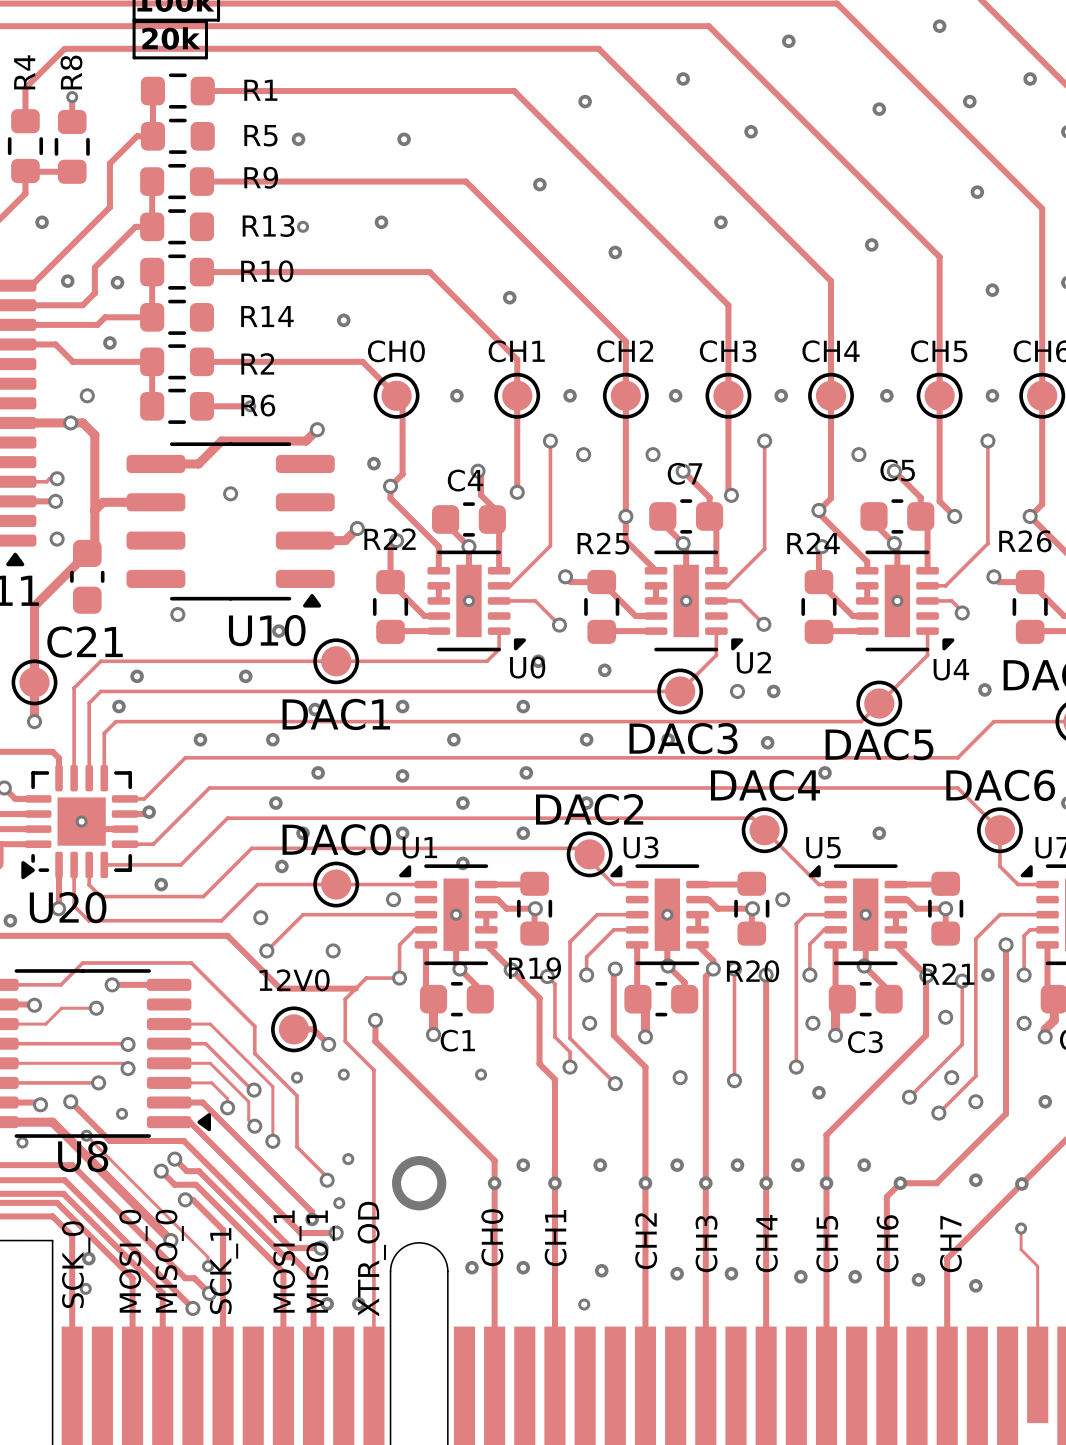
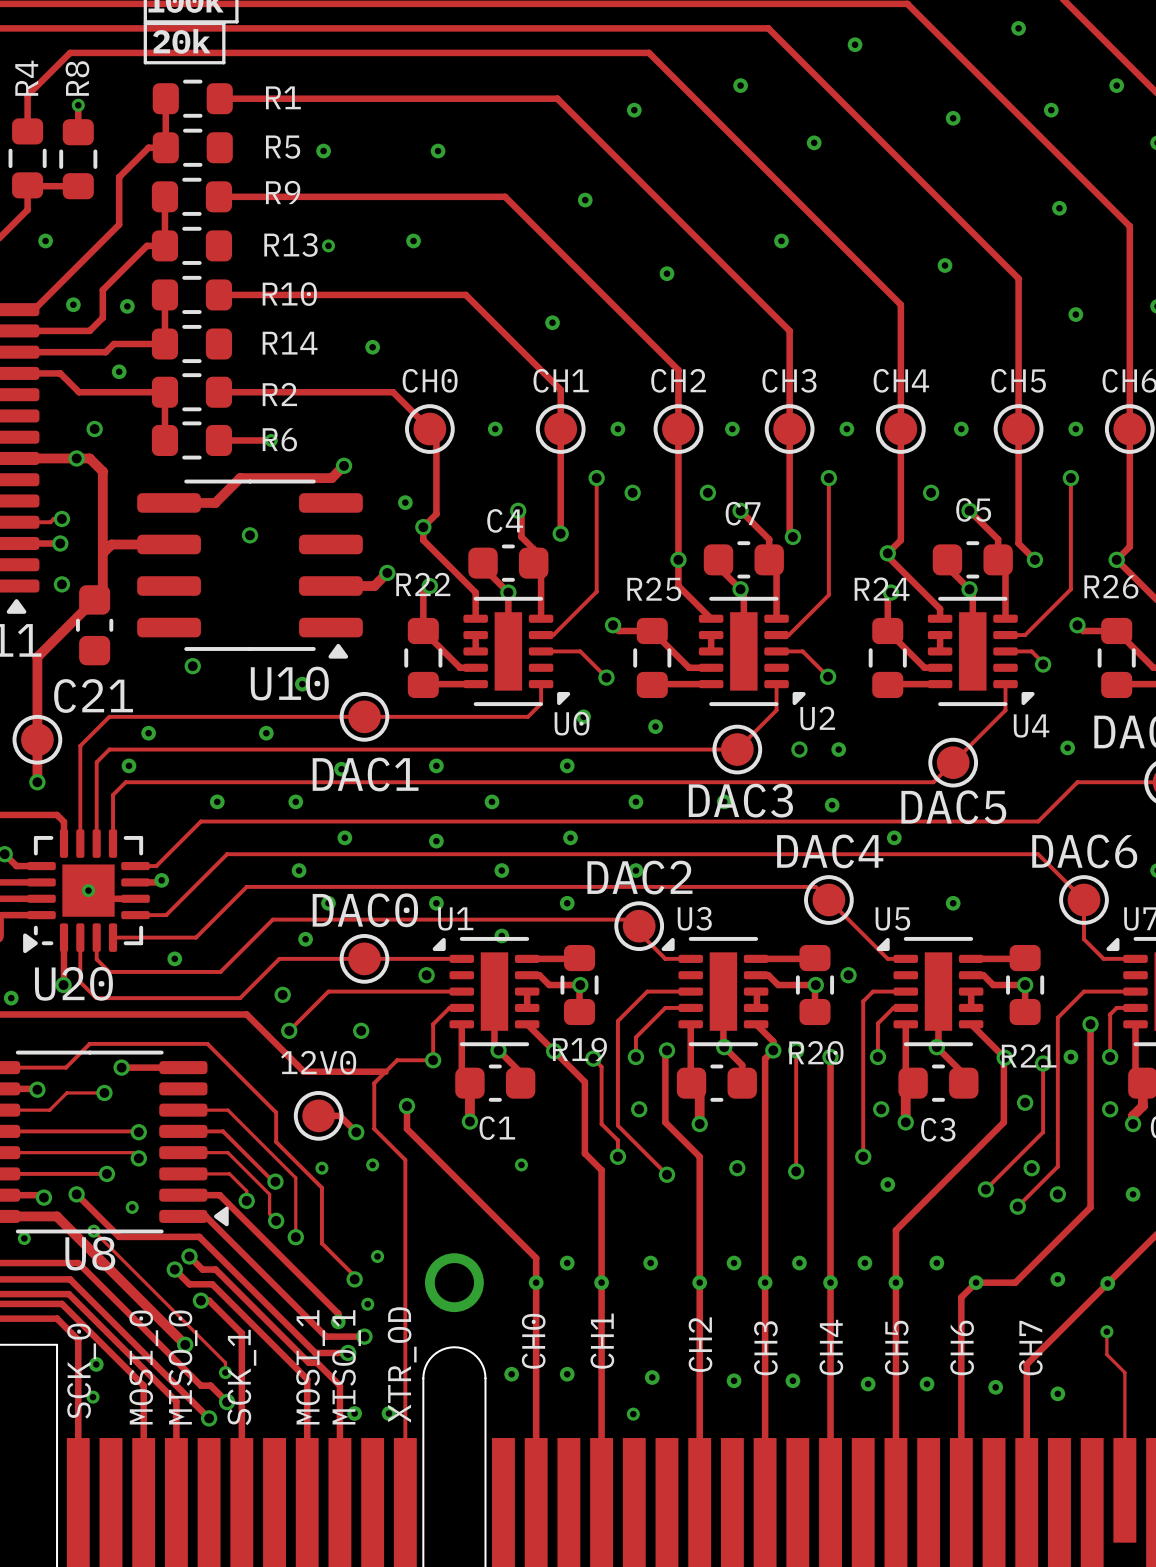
via: (468, 600) -> none
via: (686, 600) -> none
via: (897, 600) -> none
via: (456, 914) -> none
via: (667, 914) -> none
via: (865, 914) -> none

